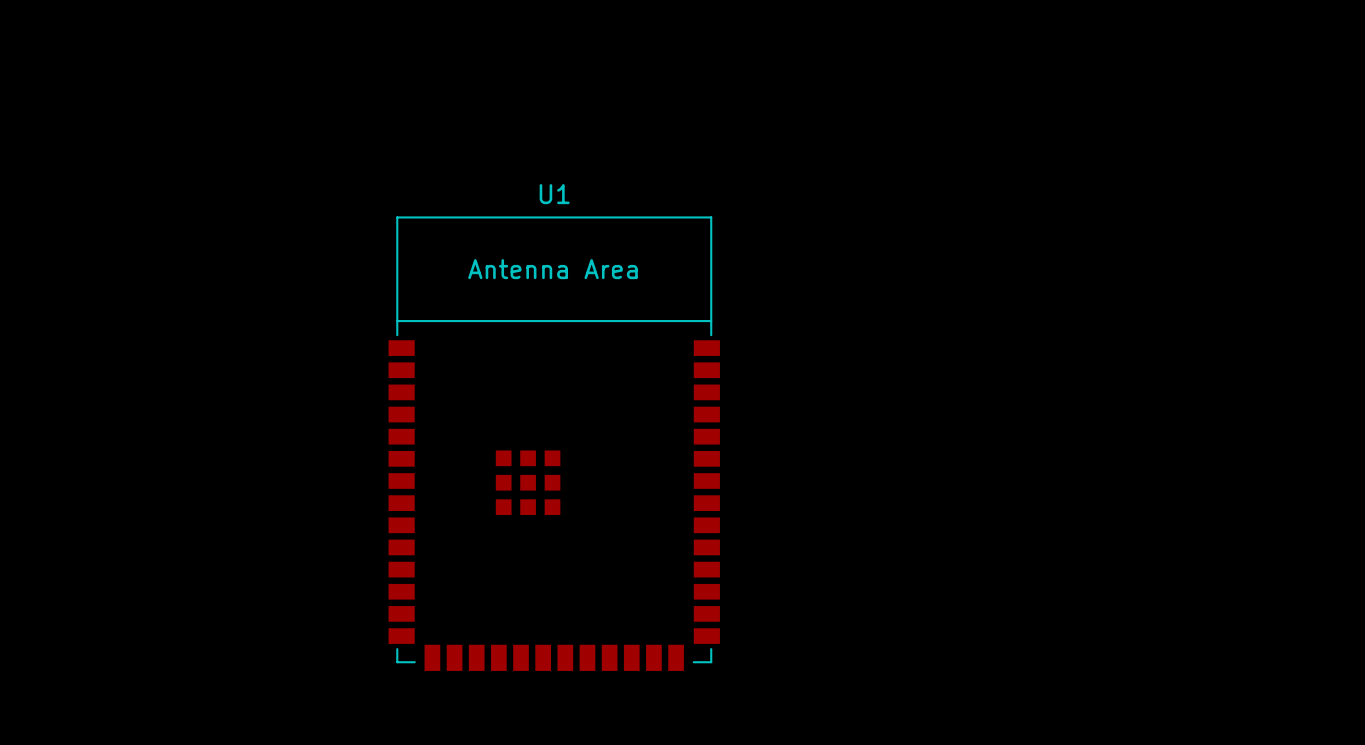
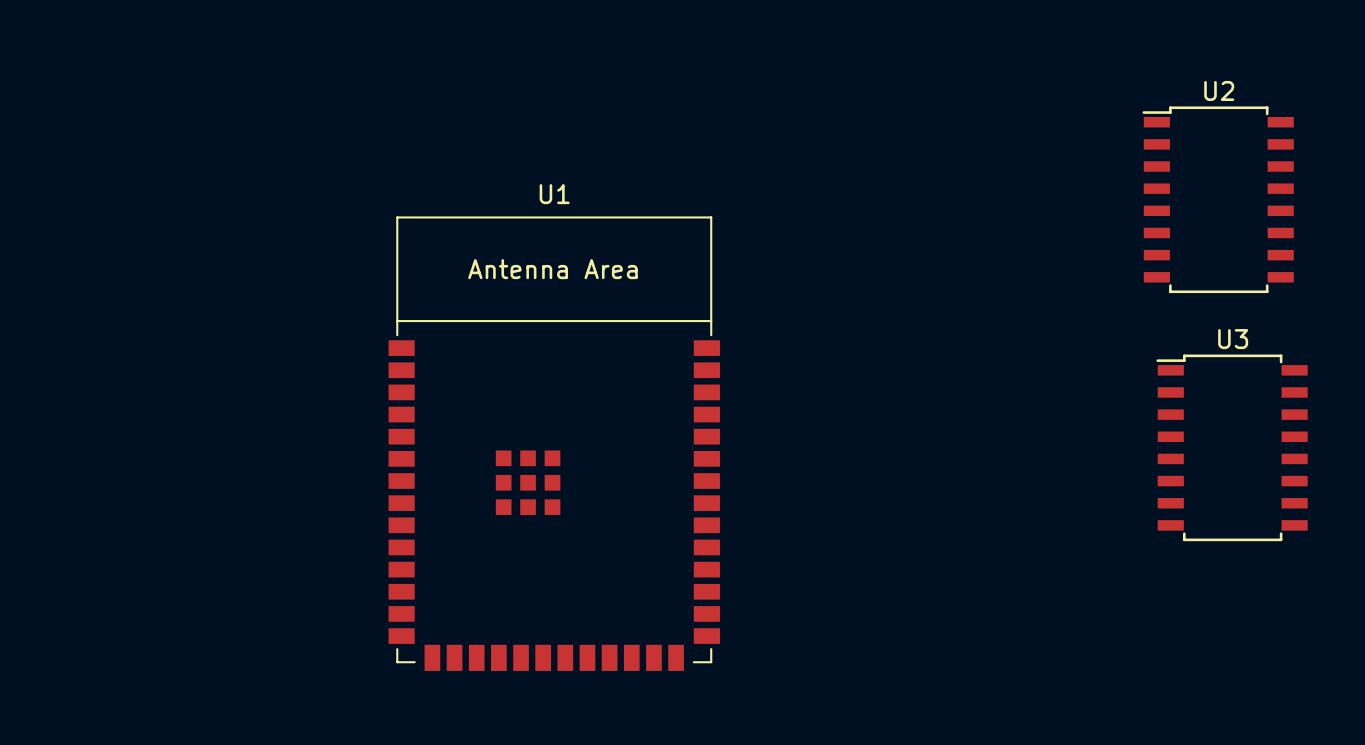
U2: none -> (1218, 199)
U3: none -> (1232, 447)

